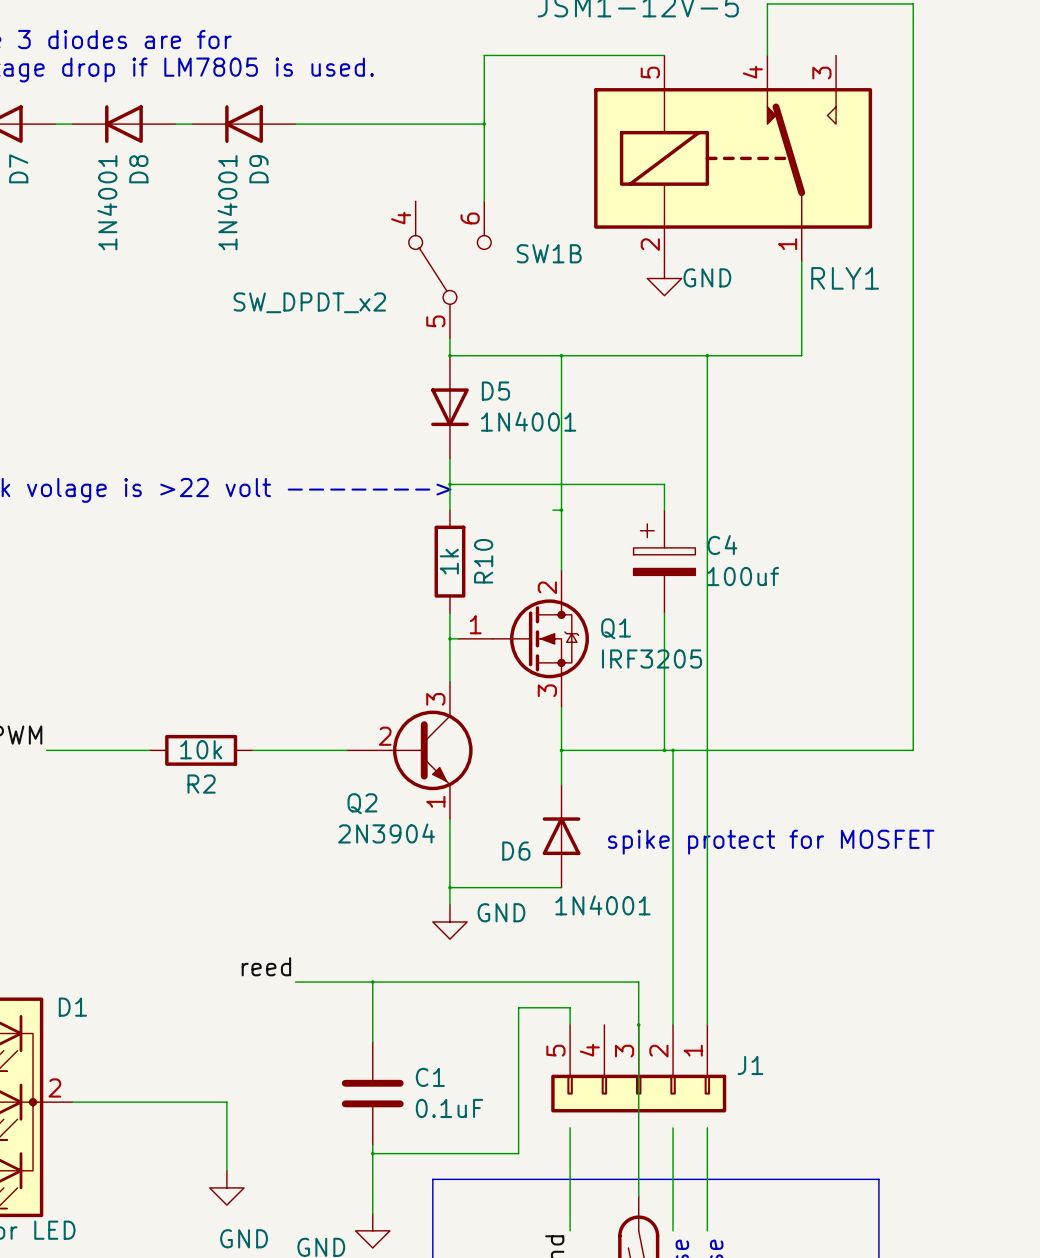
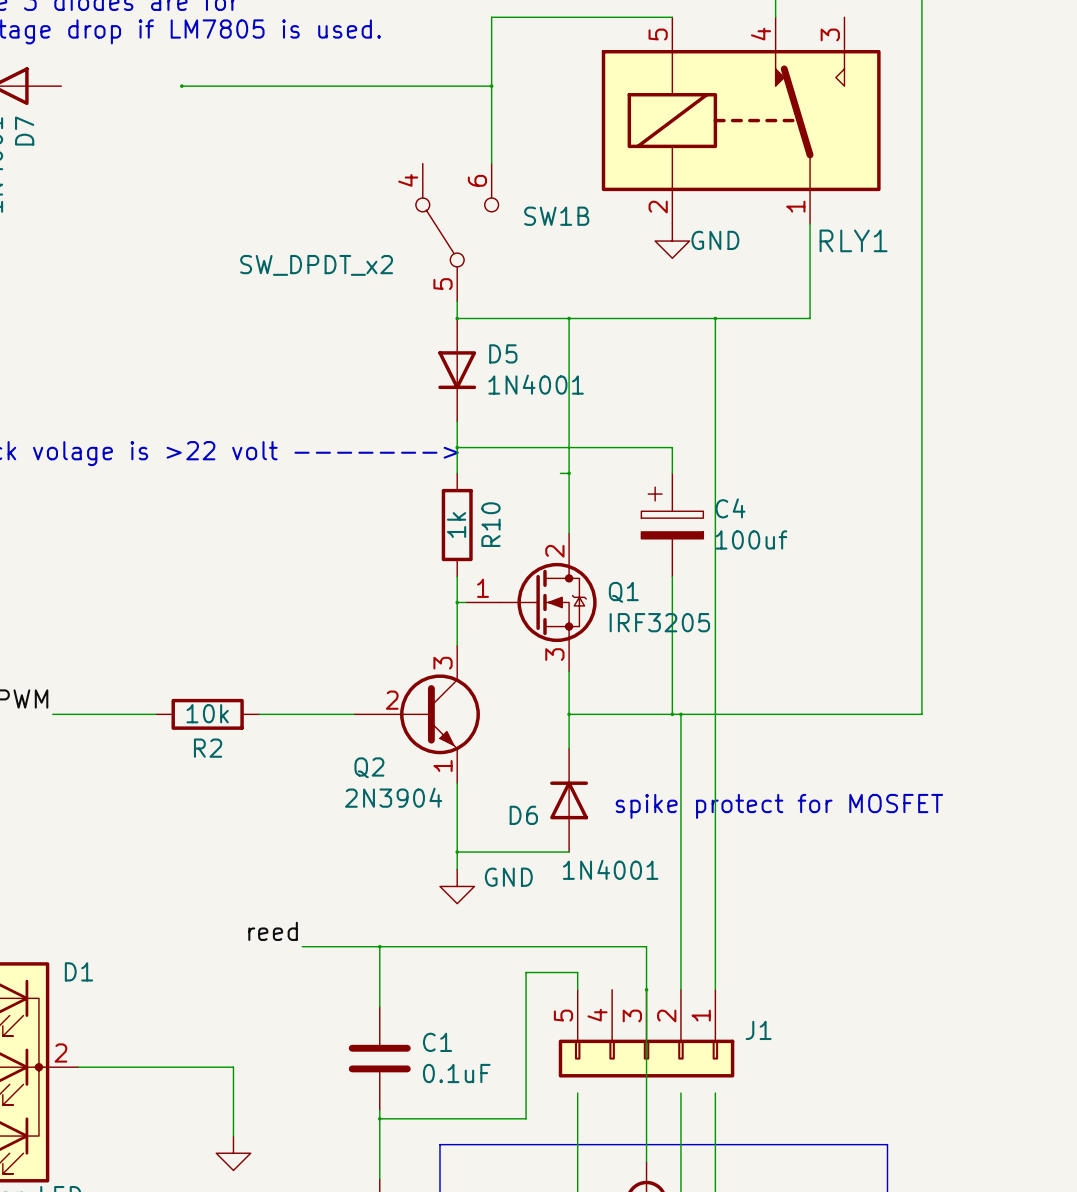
wire: (55, 124) (72, 124) -> none
D8: 1N4001 (123, 124) -> none
junction: none -> (181, 86)
D9: 1N4001 (244, 124) -> none

